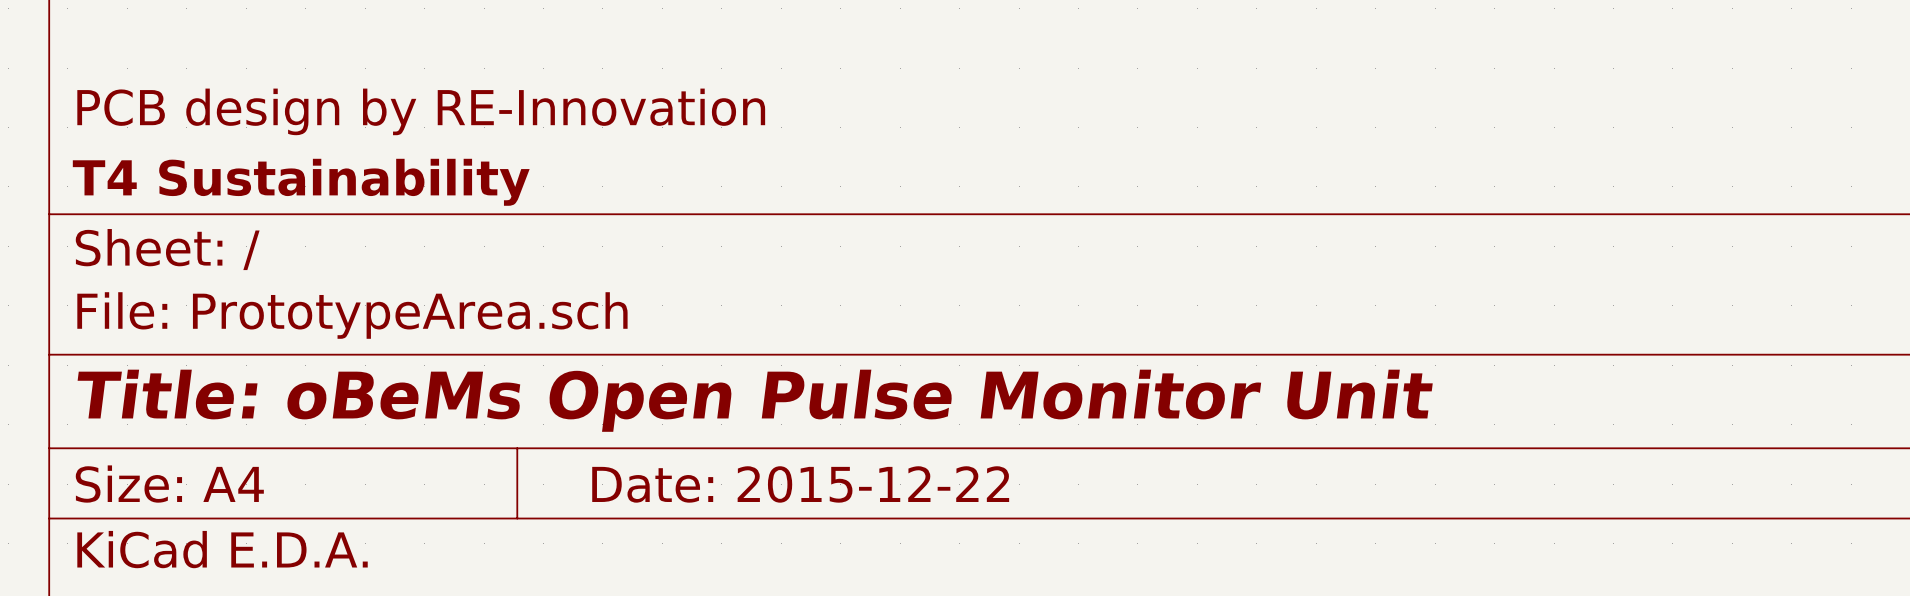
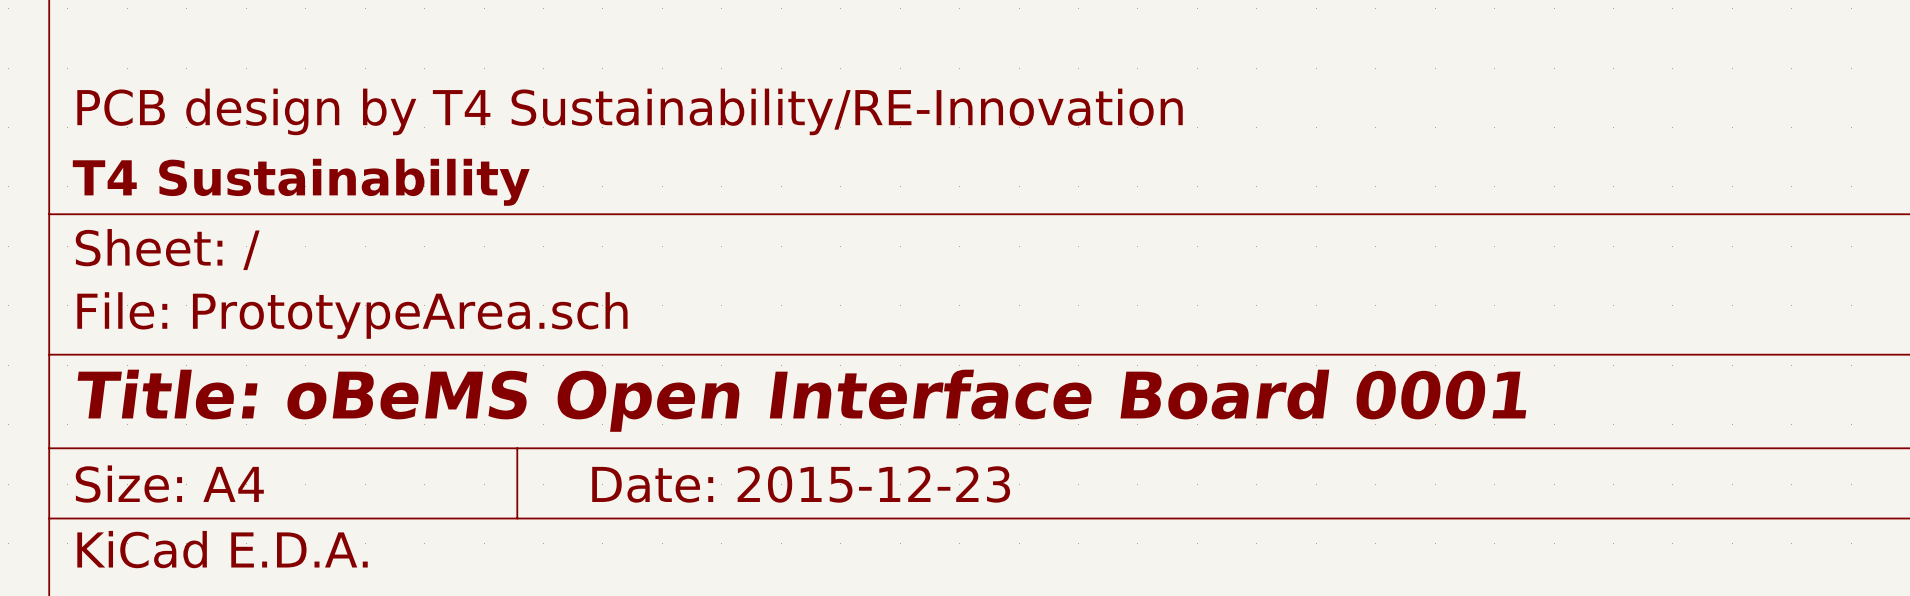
title block: PCB design by RE-Innovation (421, 111) -> PCB design by T4 Sustainability/RE-Innovation (630, 111)
title block: Title: oBeMs Open Pulse Monitor Unit (755, 400) -> Title: oBeMS Open Interface Board 0001 (801, 400)
title block: Date: 2015-12-22 (800, 484) -> Date: 2015-12-23 (801, 484)

